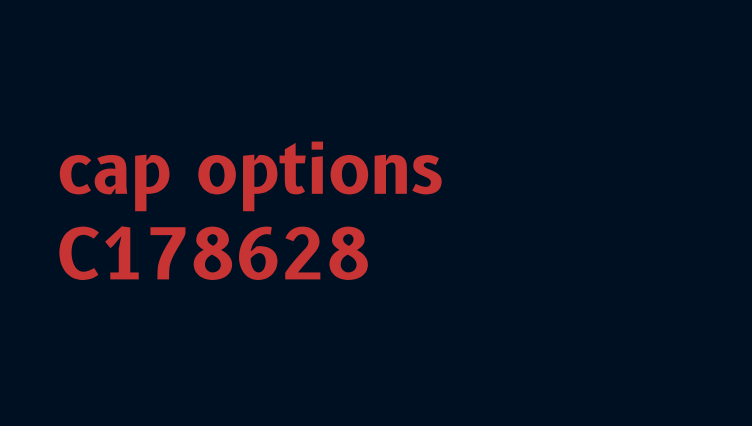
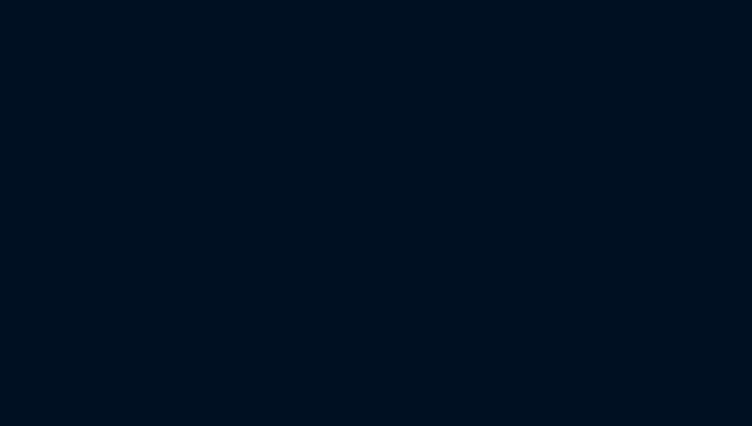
text: cap options (250, 176) -> none
text: C178628 (213, 253) -> none

